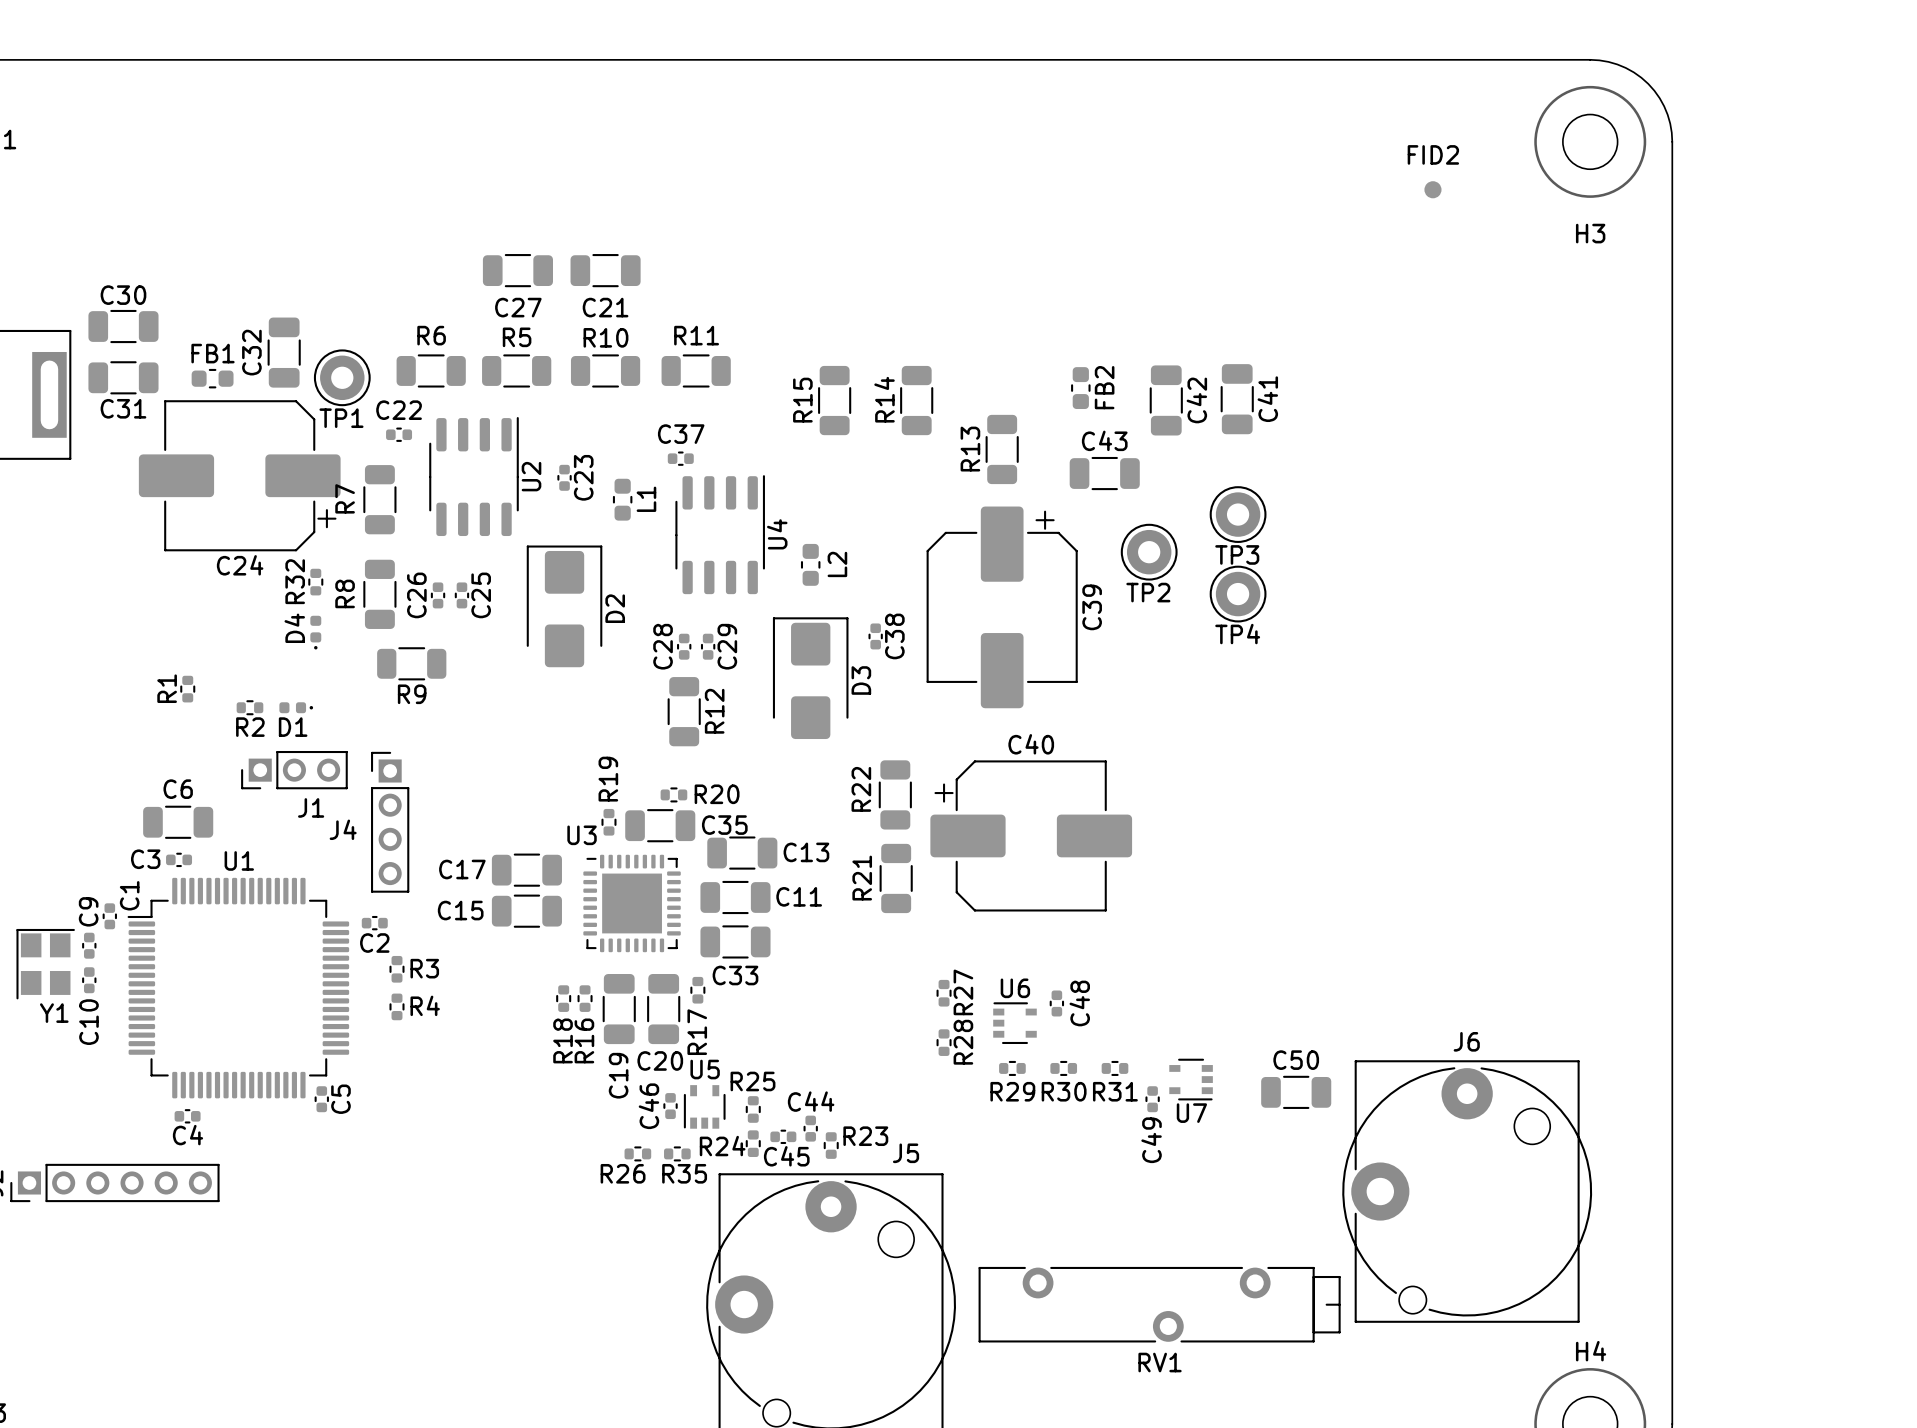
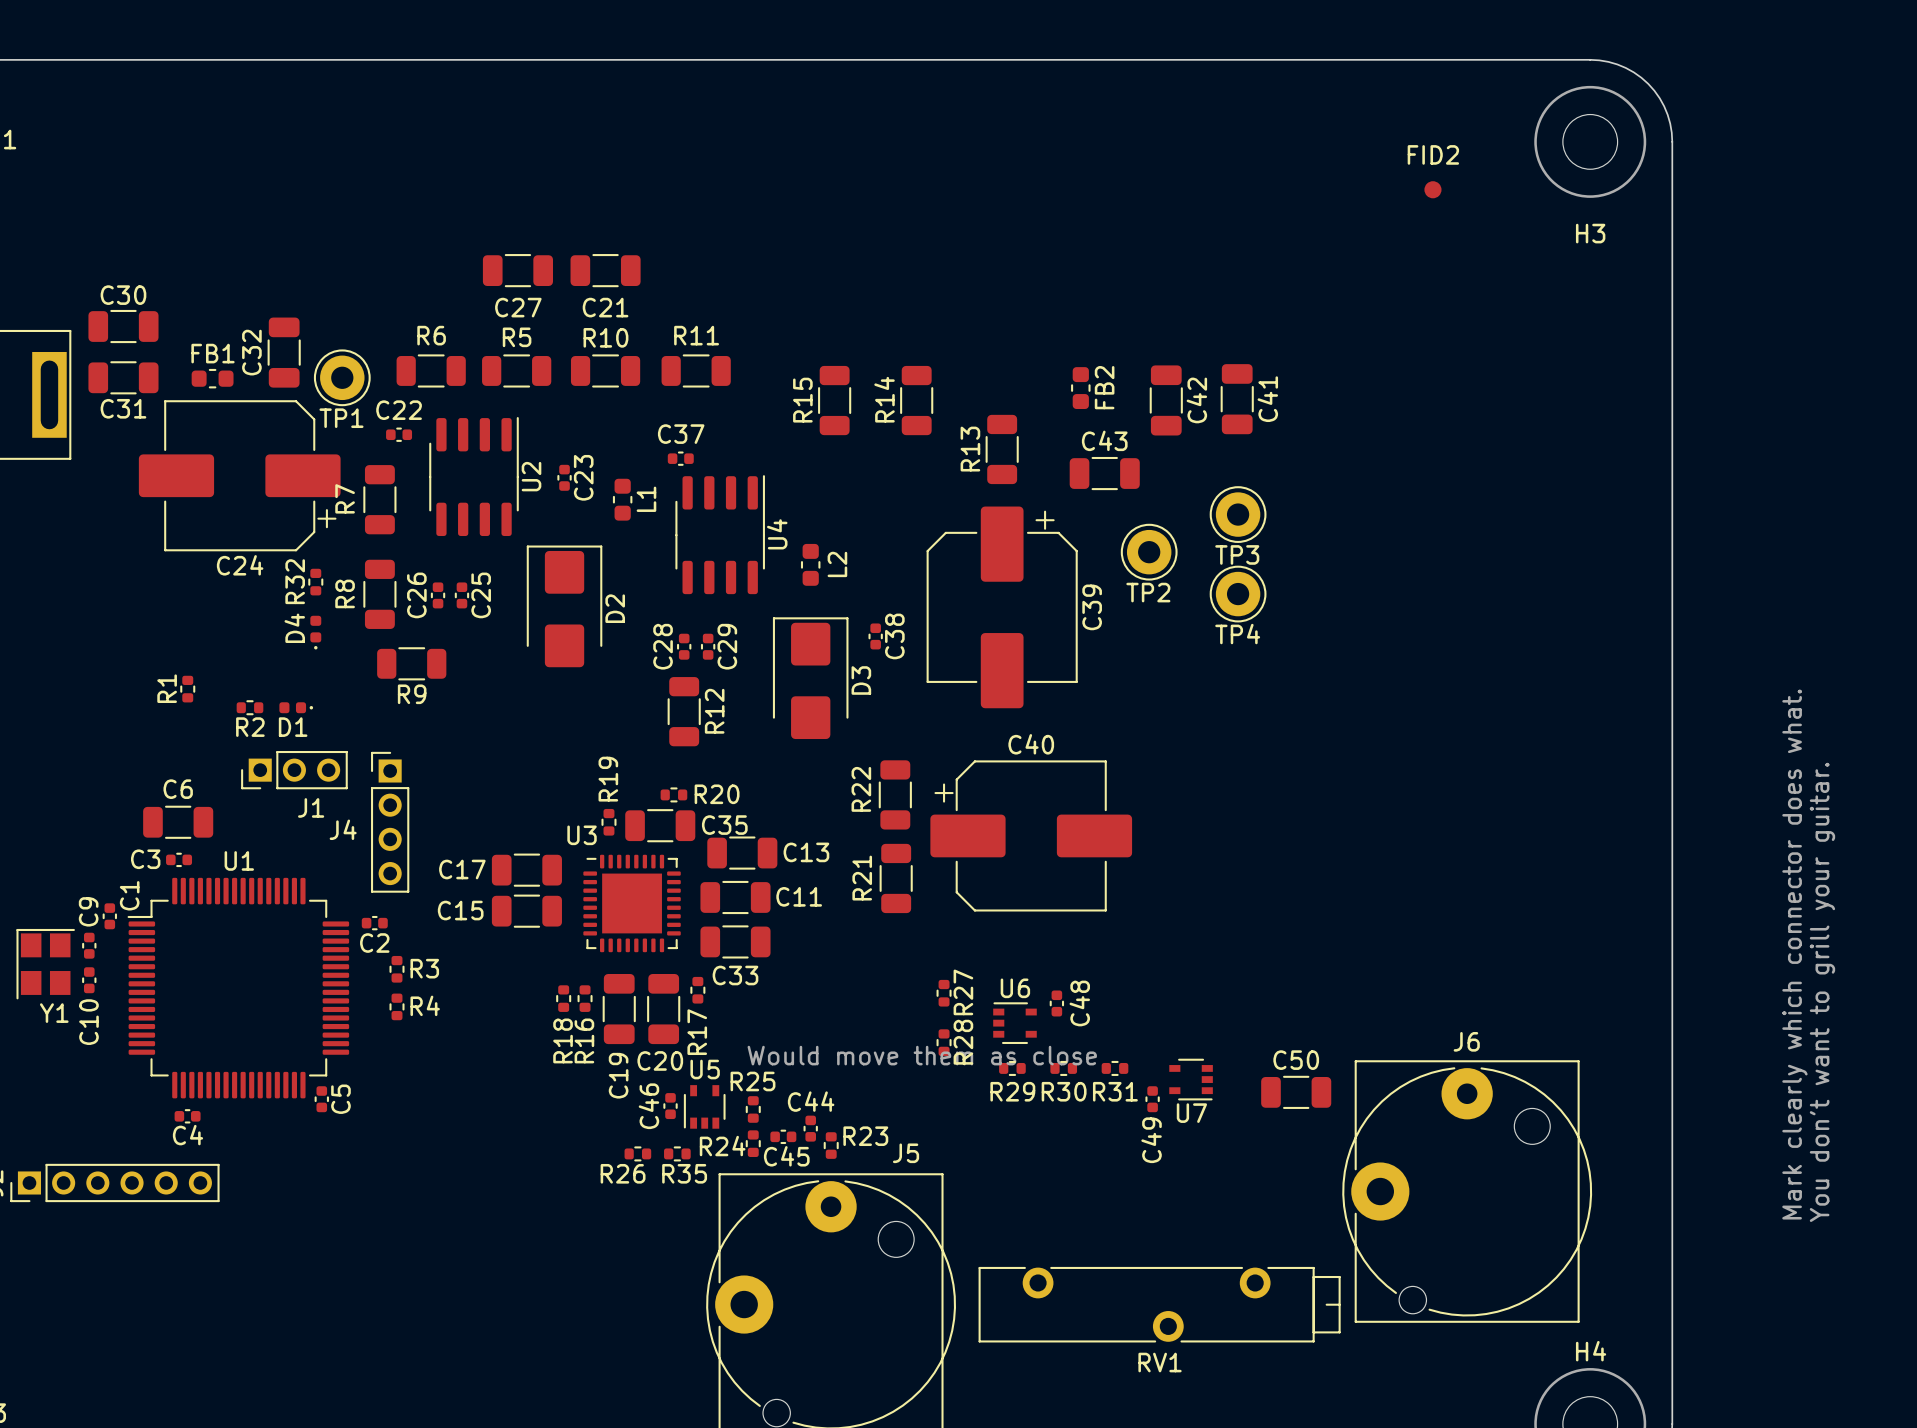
text: none -> Mark clearly which connector does what. (1794, 954)
text: none -> You don't want to grill your guitar. (1822, 992)
text: none -> Would move them as close (922, 1055)

